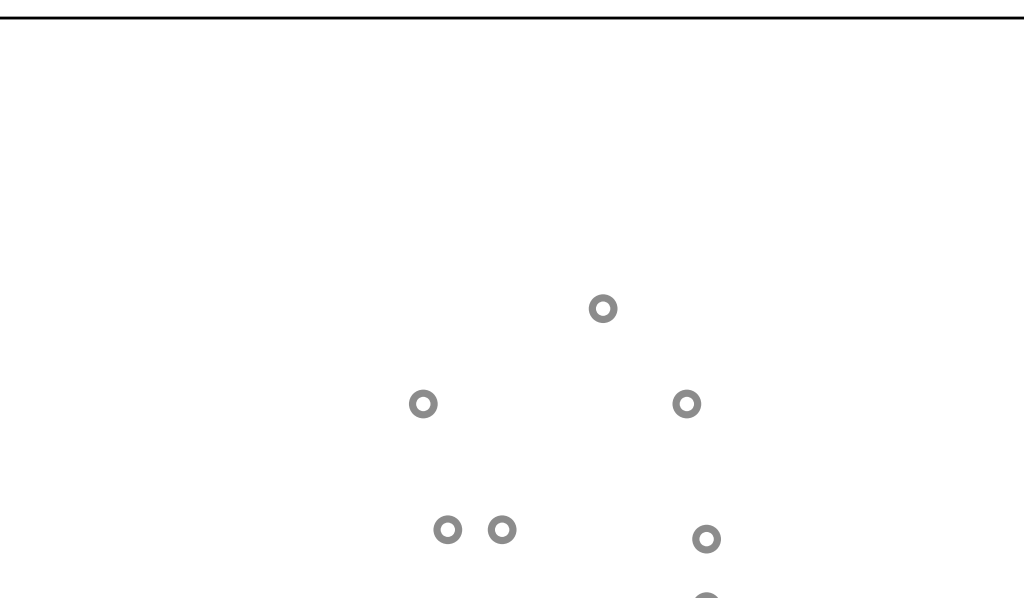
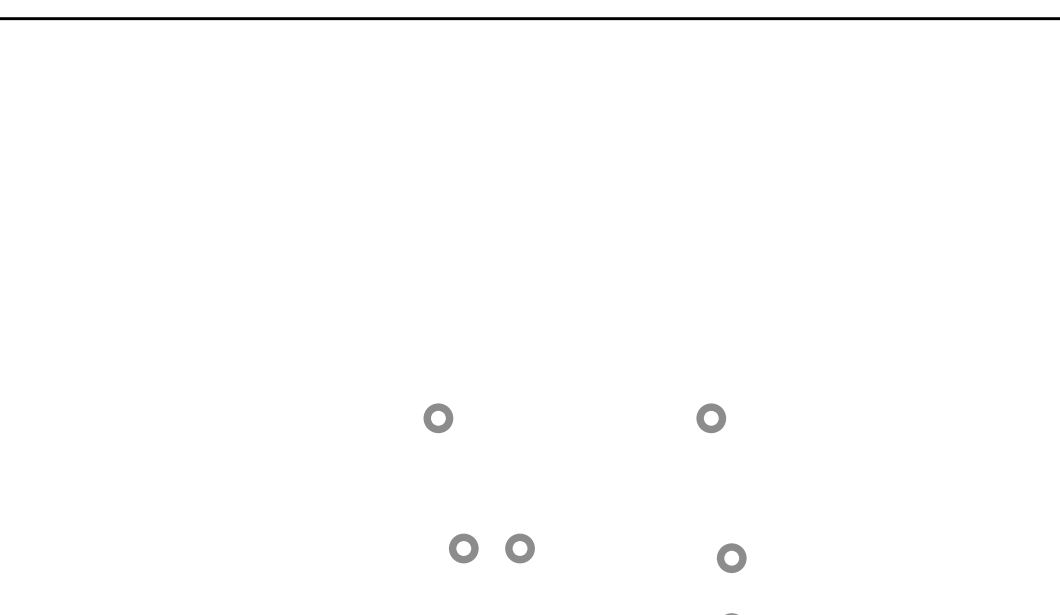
via: (603, 308) -> none

